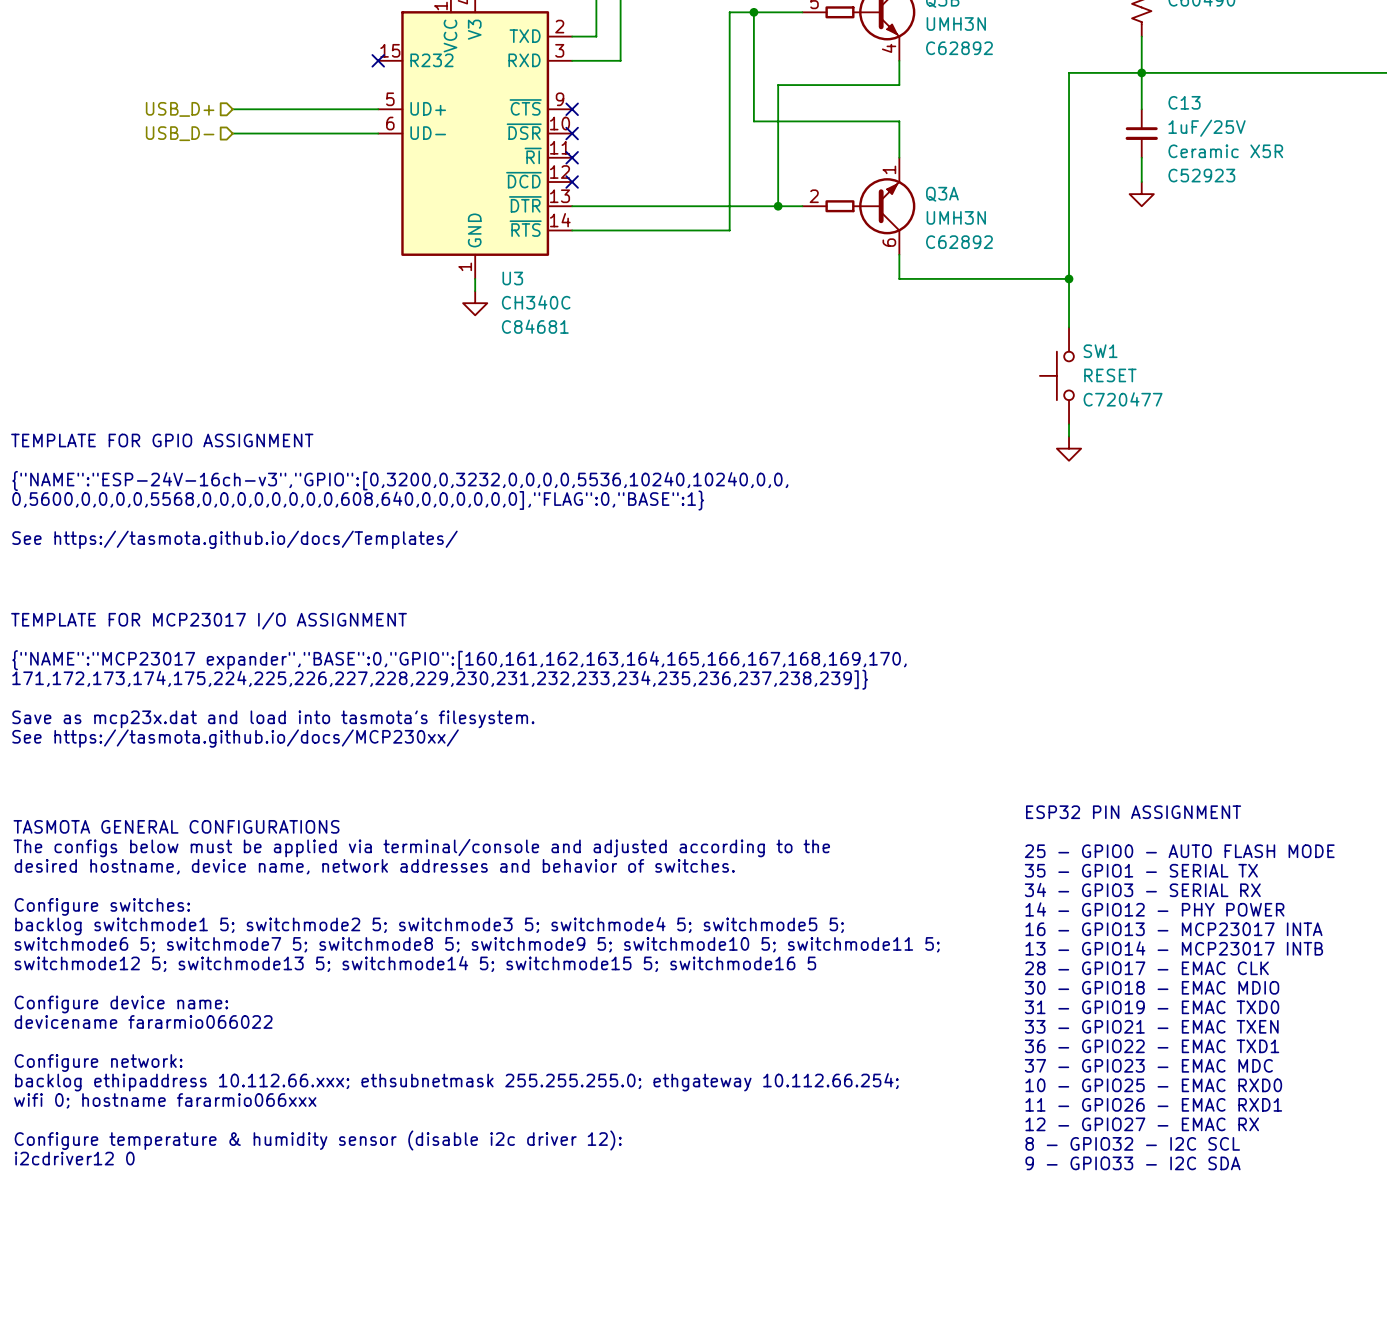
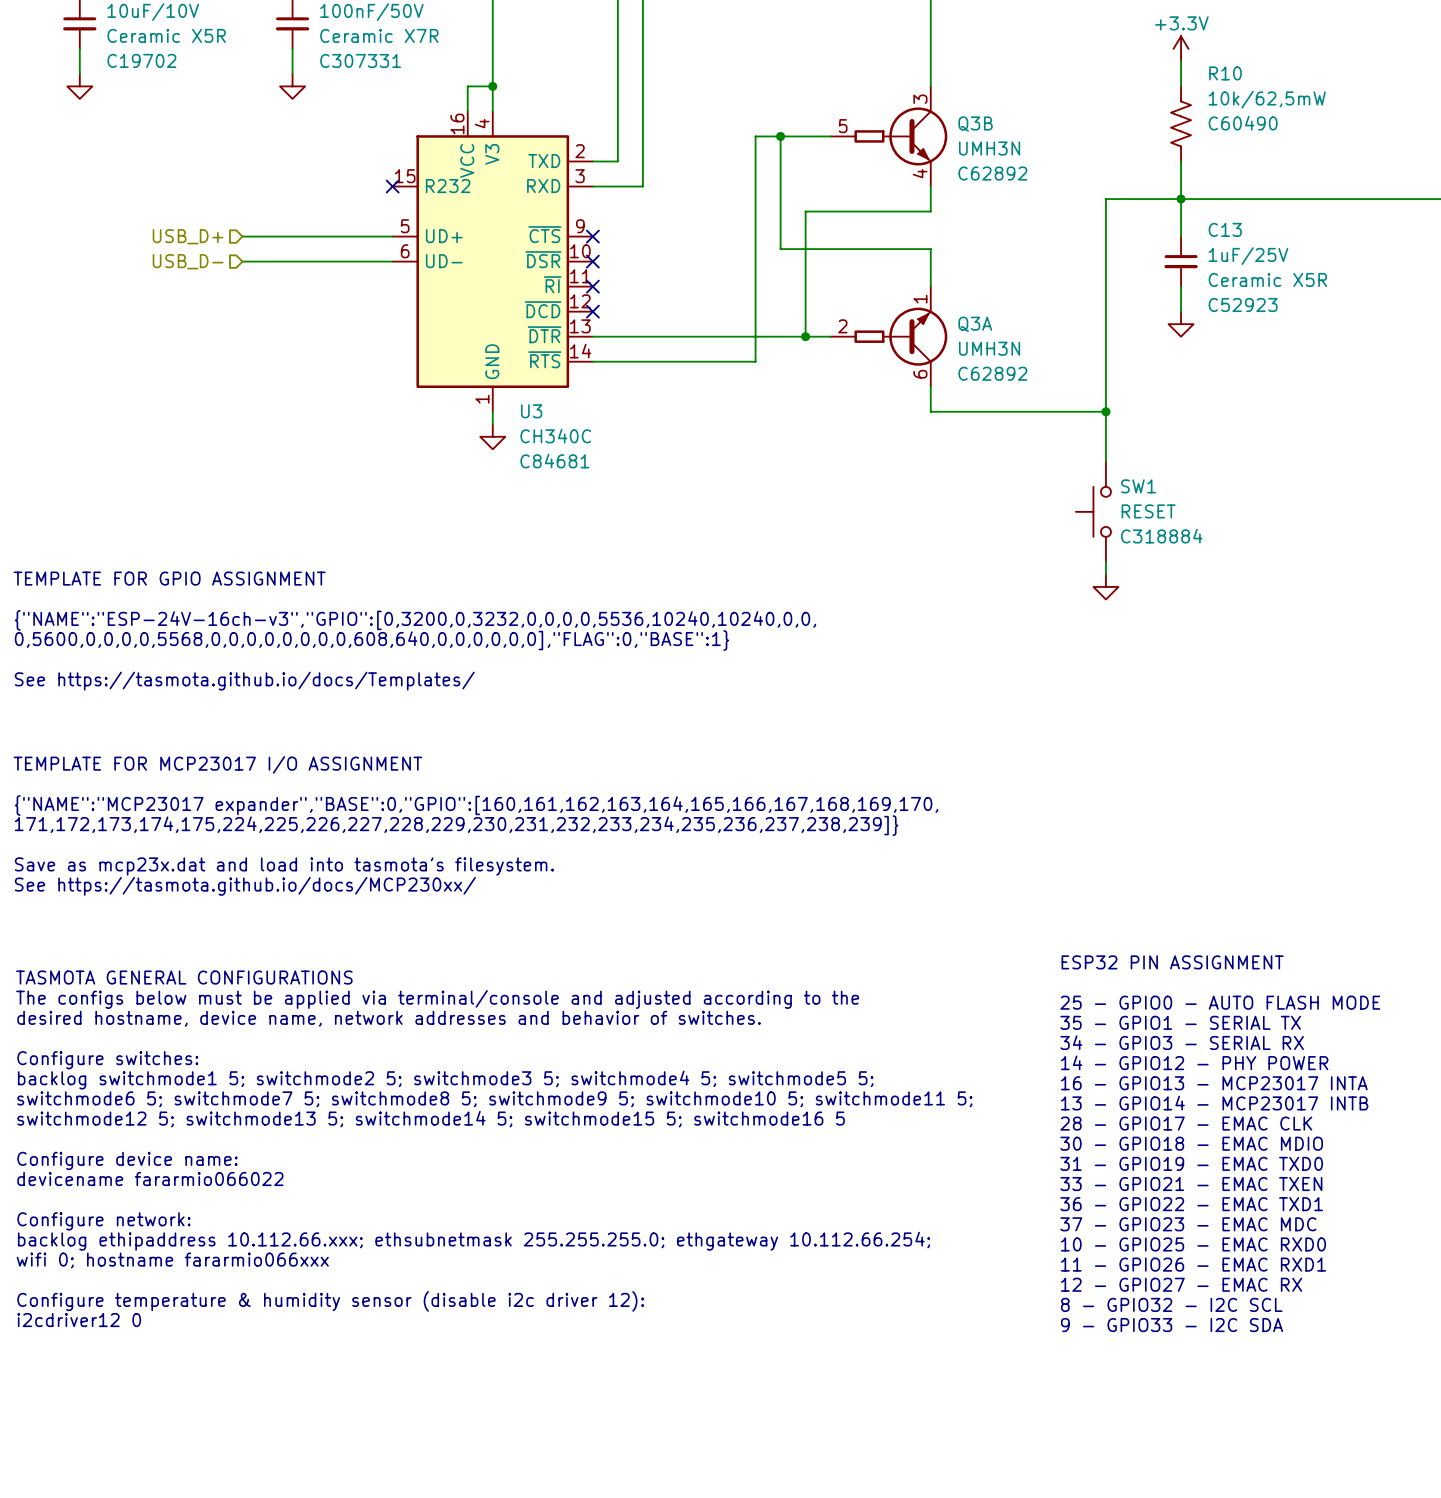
SW1 text: C720477 (1123, 399) -> C318884 (1161, 536)

